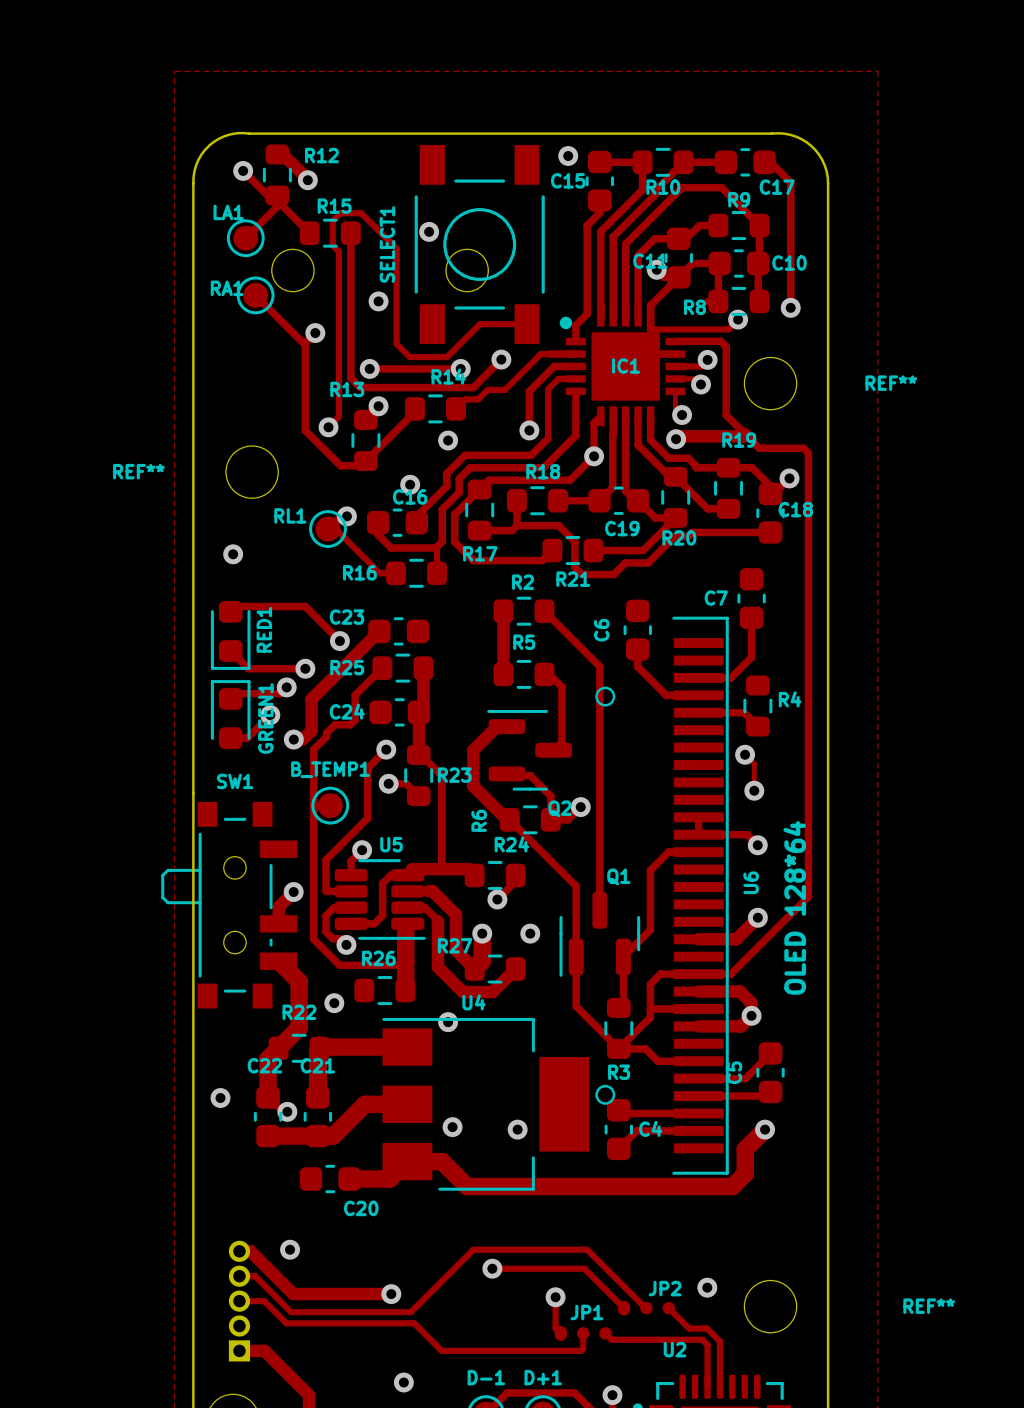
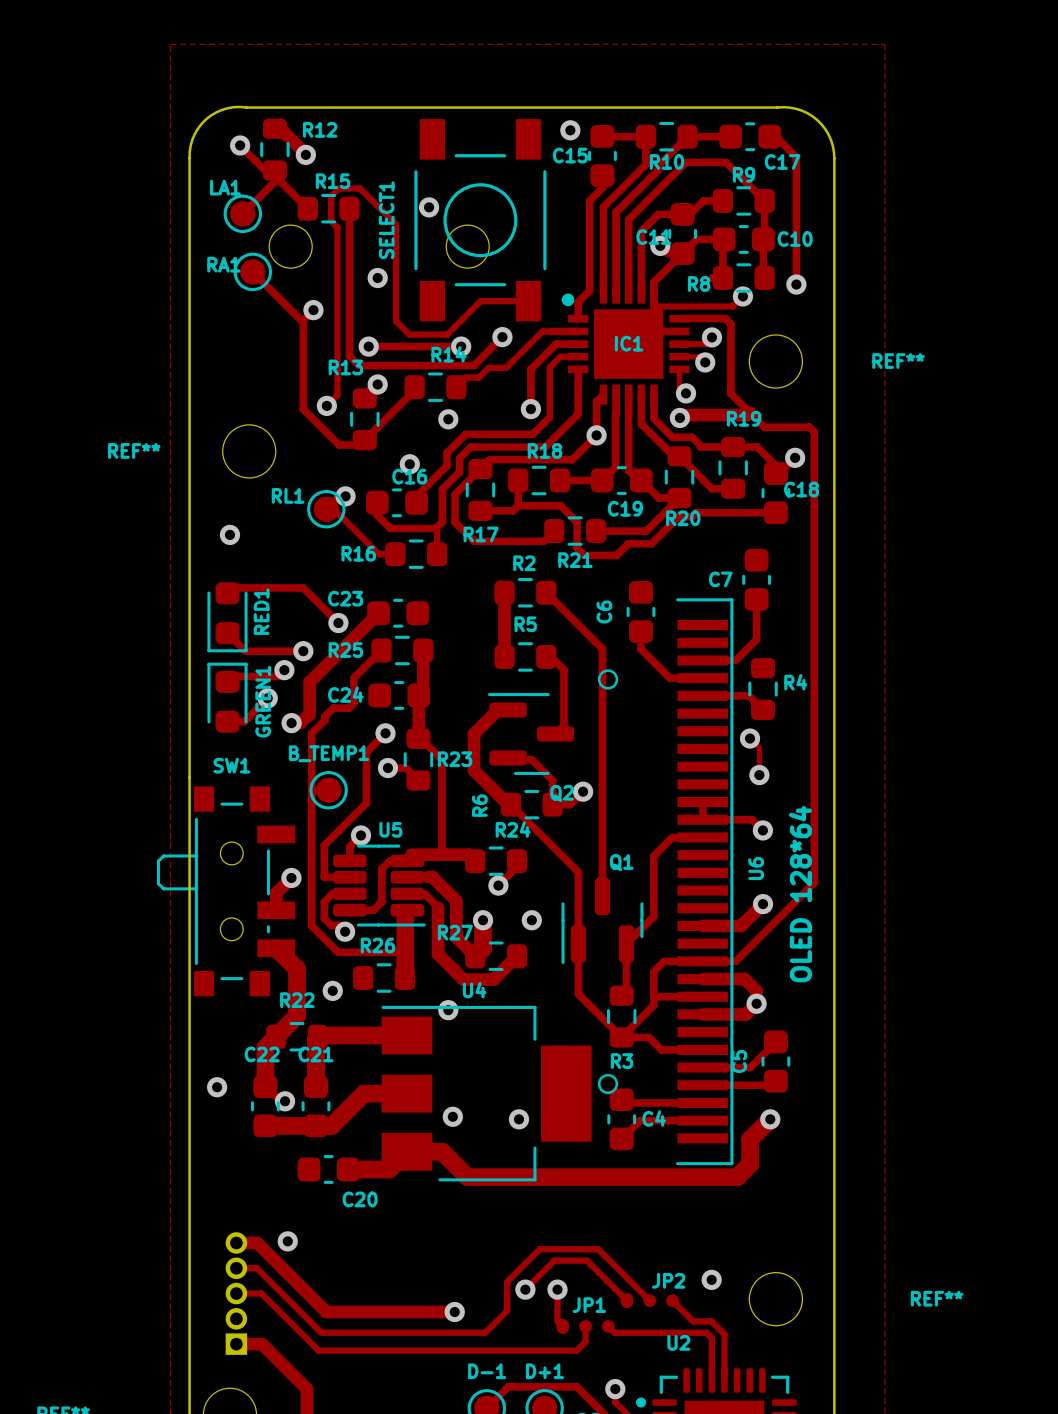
track: (250, 1251) (293, 1294) (391, 1294) -> (247, 1242) (257, 1242) (326, 1312) (454, 1312)
track: (492, 1268) (552, 1268) -> (525, 1289) (554, 1260)
via: (492, 1268) -> none
track: (255, 1276) (291, 1312) (411, 1312) (473, 1249) (587, 1249) (646, 1308) -> (252, 1268) (256, 1268) (321, 1332) (485, 1332) (507, 1311) (507, 1282) (539, 1249) (598, 1249) (649, 1300)
via: (391, 1294) -> none
via: none -> (525, 1289)
via: none -> (454, 1312)
track: (286, 1323) (414, 1323) (441, 1350) (580, 1350) -> (284, 1316) (318, 1350) (576, 1350) (583, 1344)
via: (403, 1382) -> none

